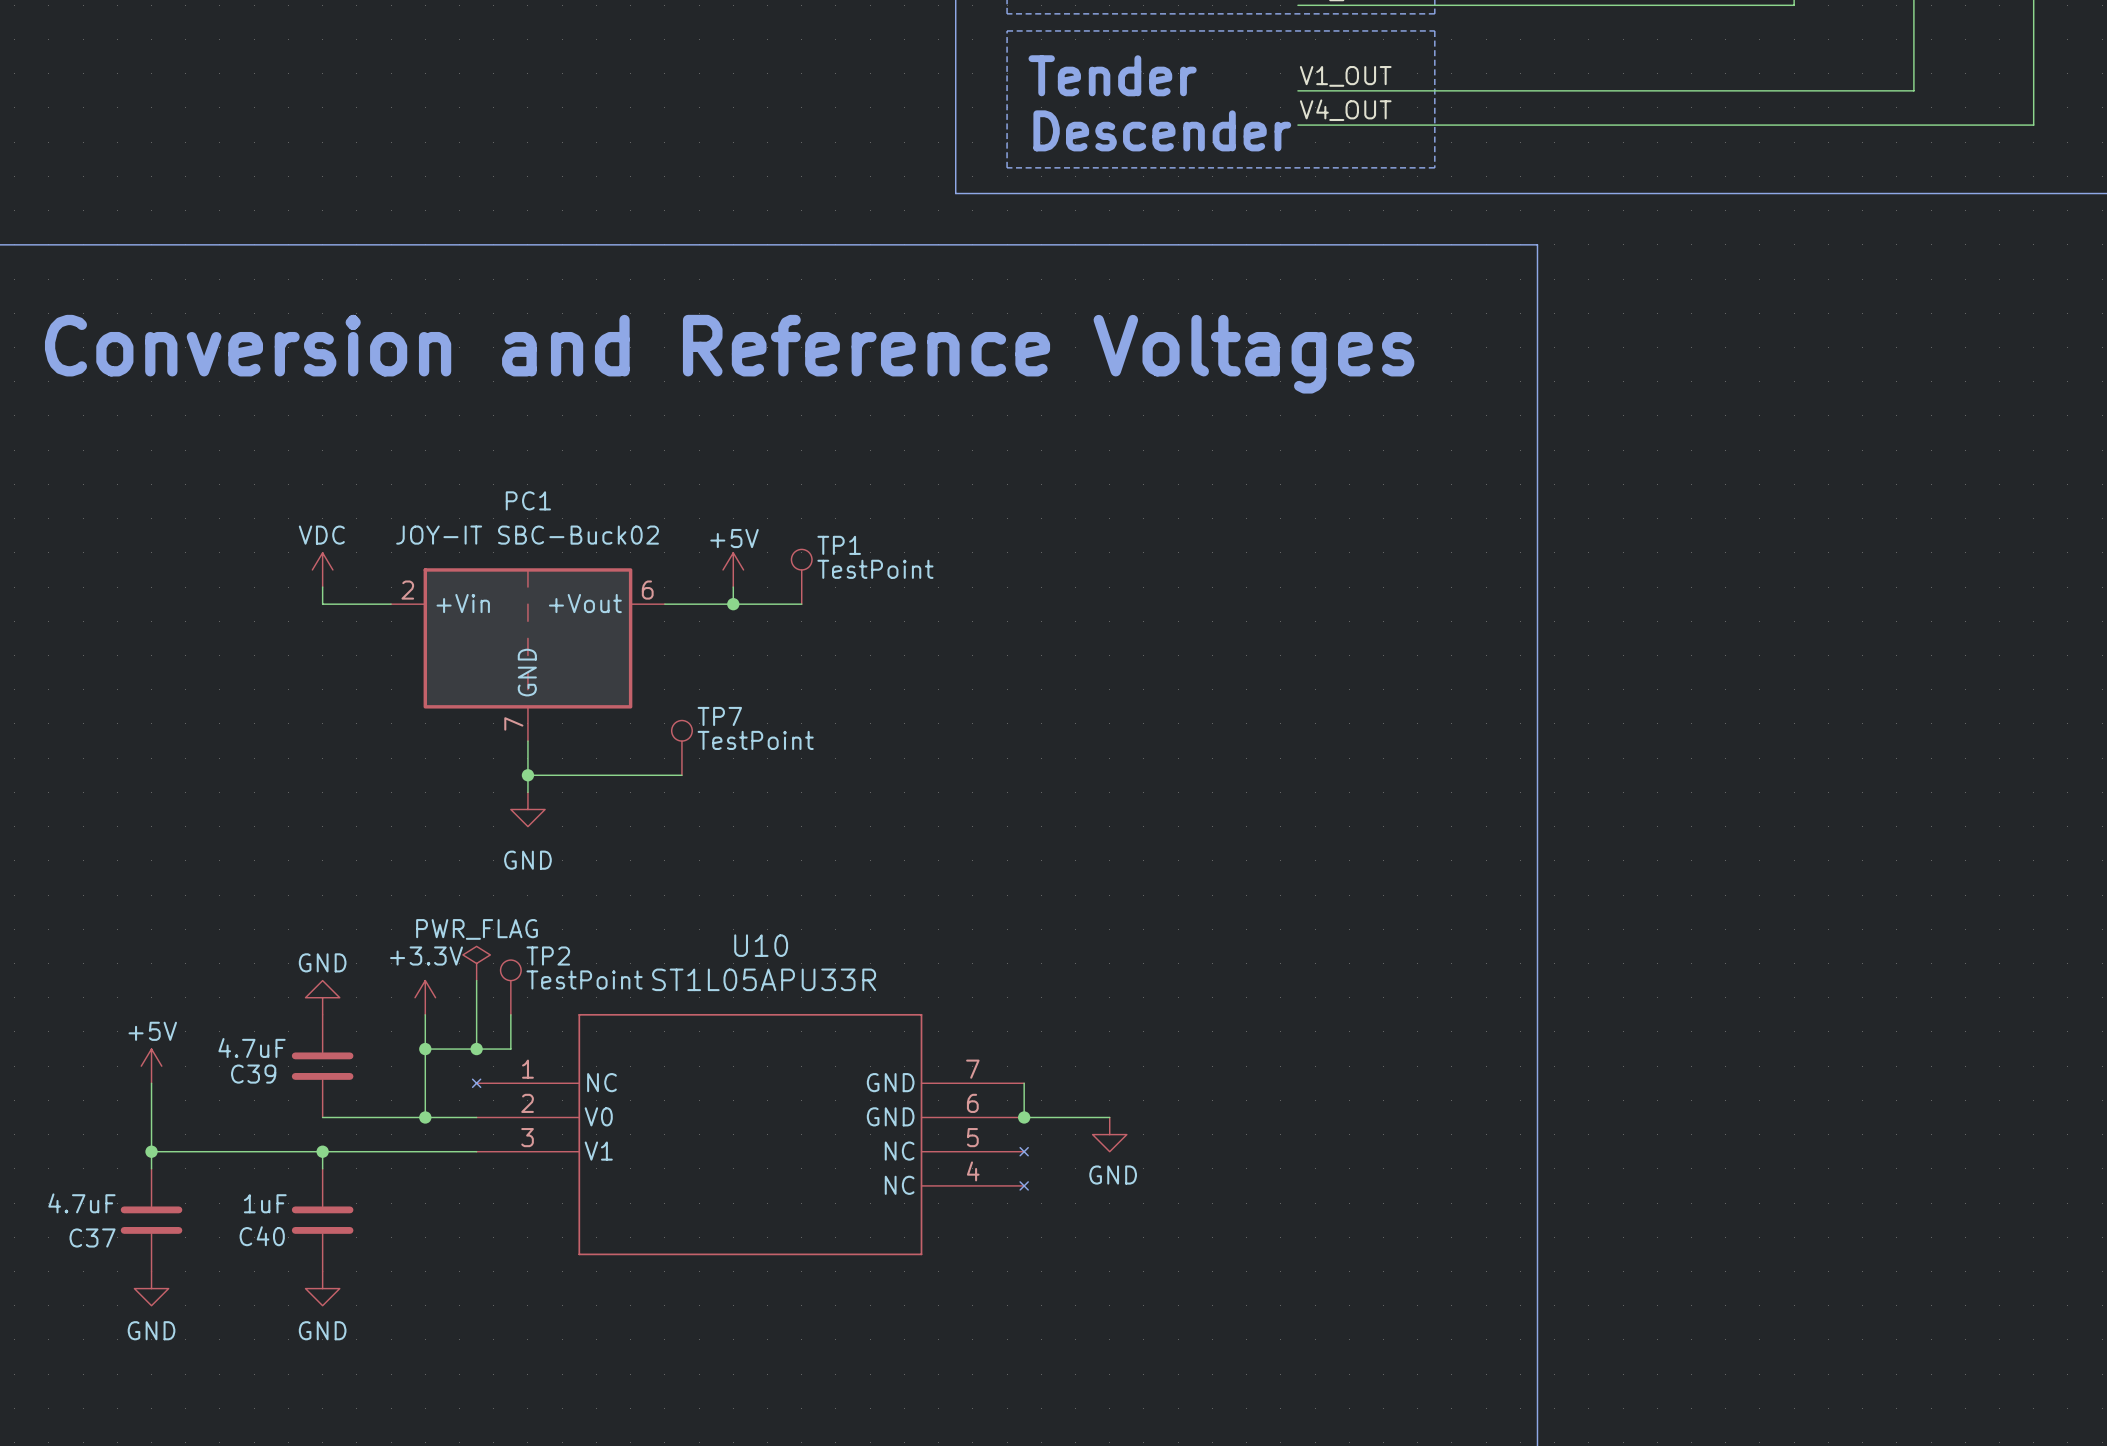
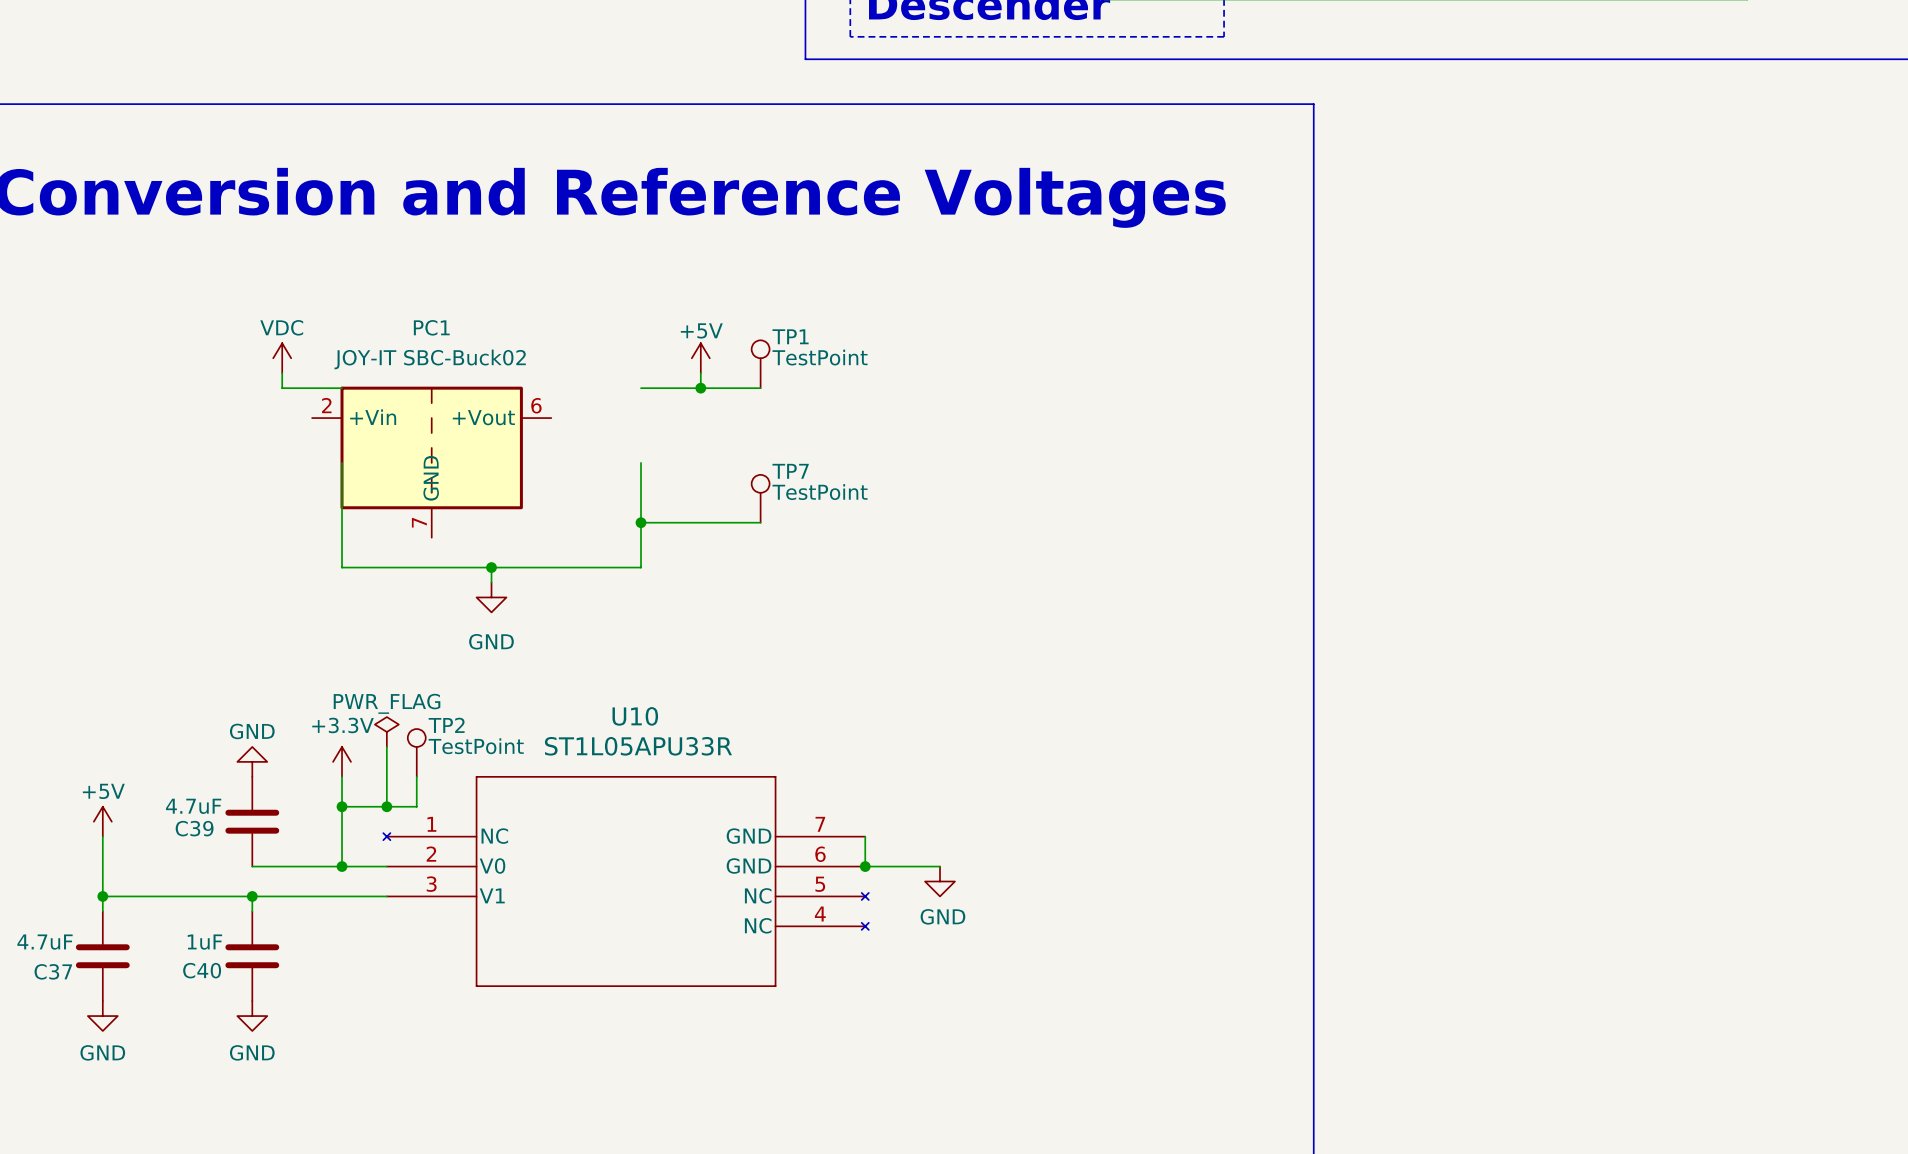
power symbol position: VDC (322, 569) -> VDC (282, 358)
power symbol position: +5V (733, 569) -> +5V (700, 358)
junction: none -> (700, 388)
TP1 position: (801, 576) -> (760, 364)
wire: (322, 587) (322, 604) (391, 604) -> (282, 373) (282, 388) (342, 388)
wire: (733, 587) (733, 604) -> (700, 373) (700, 388)
wire: (664, 604) (801, 604) -> (641, 388) (760, 388)
junction: (733, 604) -> none
wire: none -> (342, 462) (342, 567) (431, 567)
wire: none -> (641, 462) (641, 567) (566, 567)
wire: none -> (641, 522) (760, 522)
junction: none -> (641, 522)
wire: (527, 741) (527, 792) -> none
TP7 position: (681, 747) -> (760, 498)
junction position: (527, 775) -> (491, 567)
wire: none -> (491, 567) (491, 582)
power symbol position: GND (527, 809) -> GND (491, 597)

